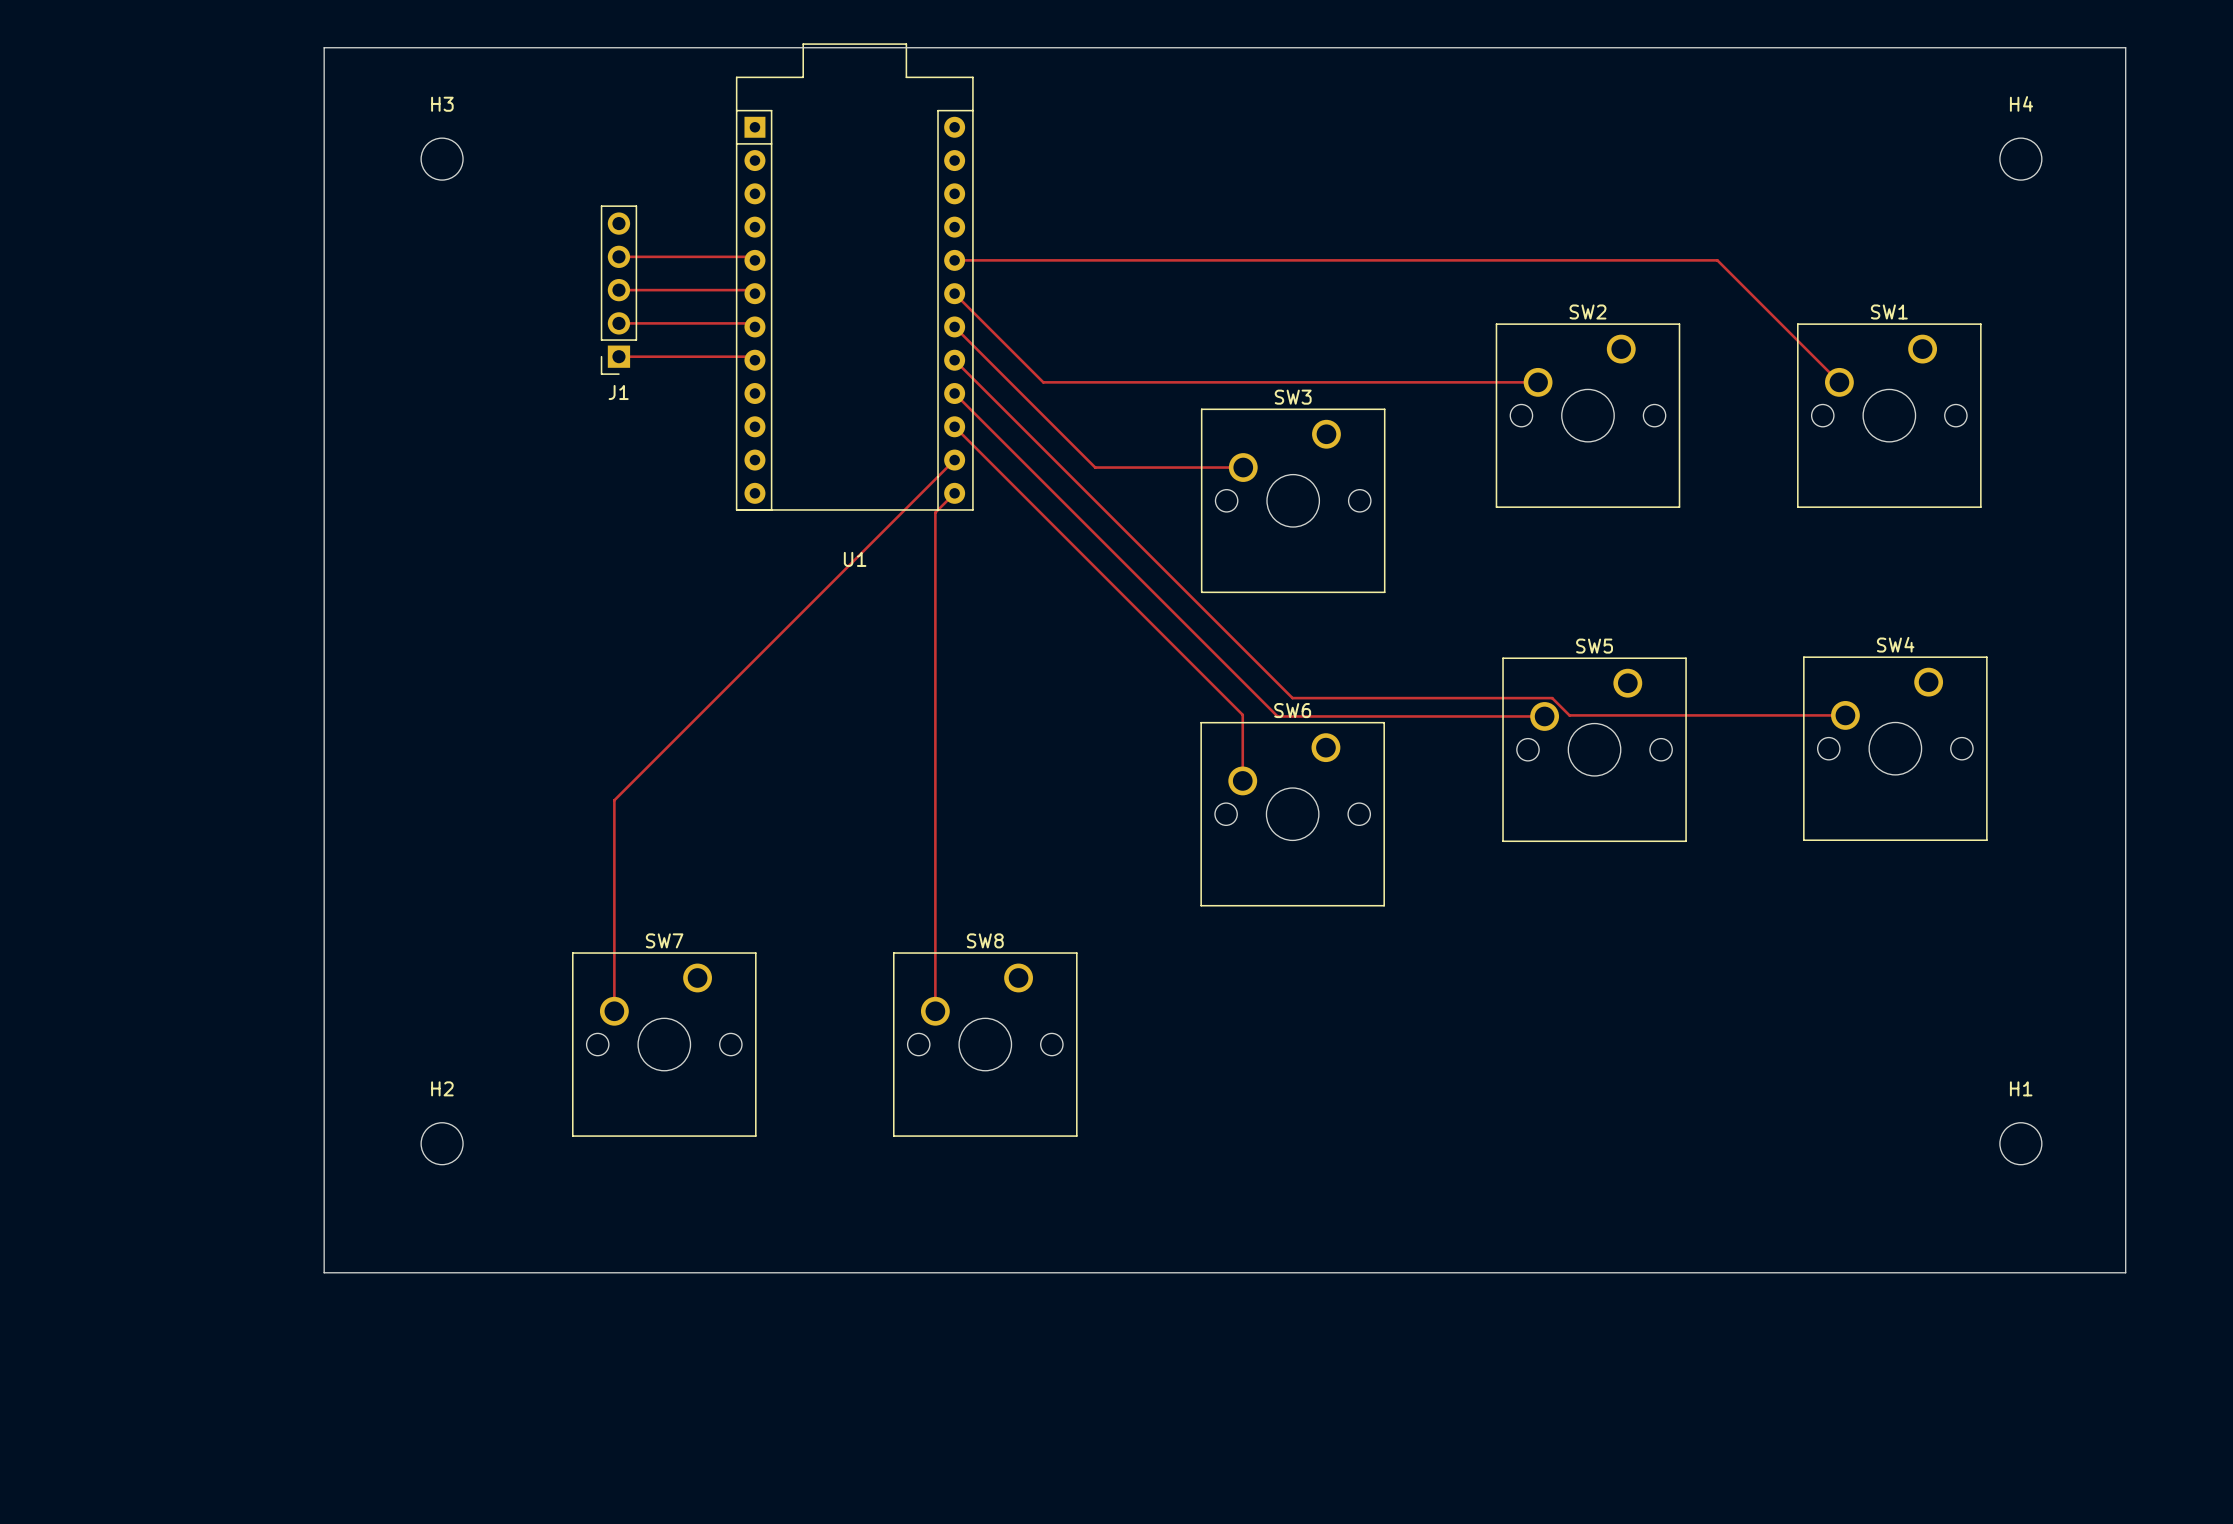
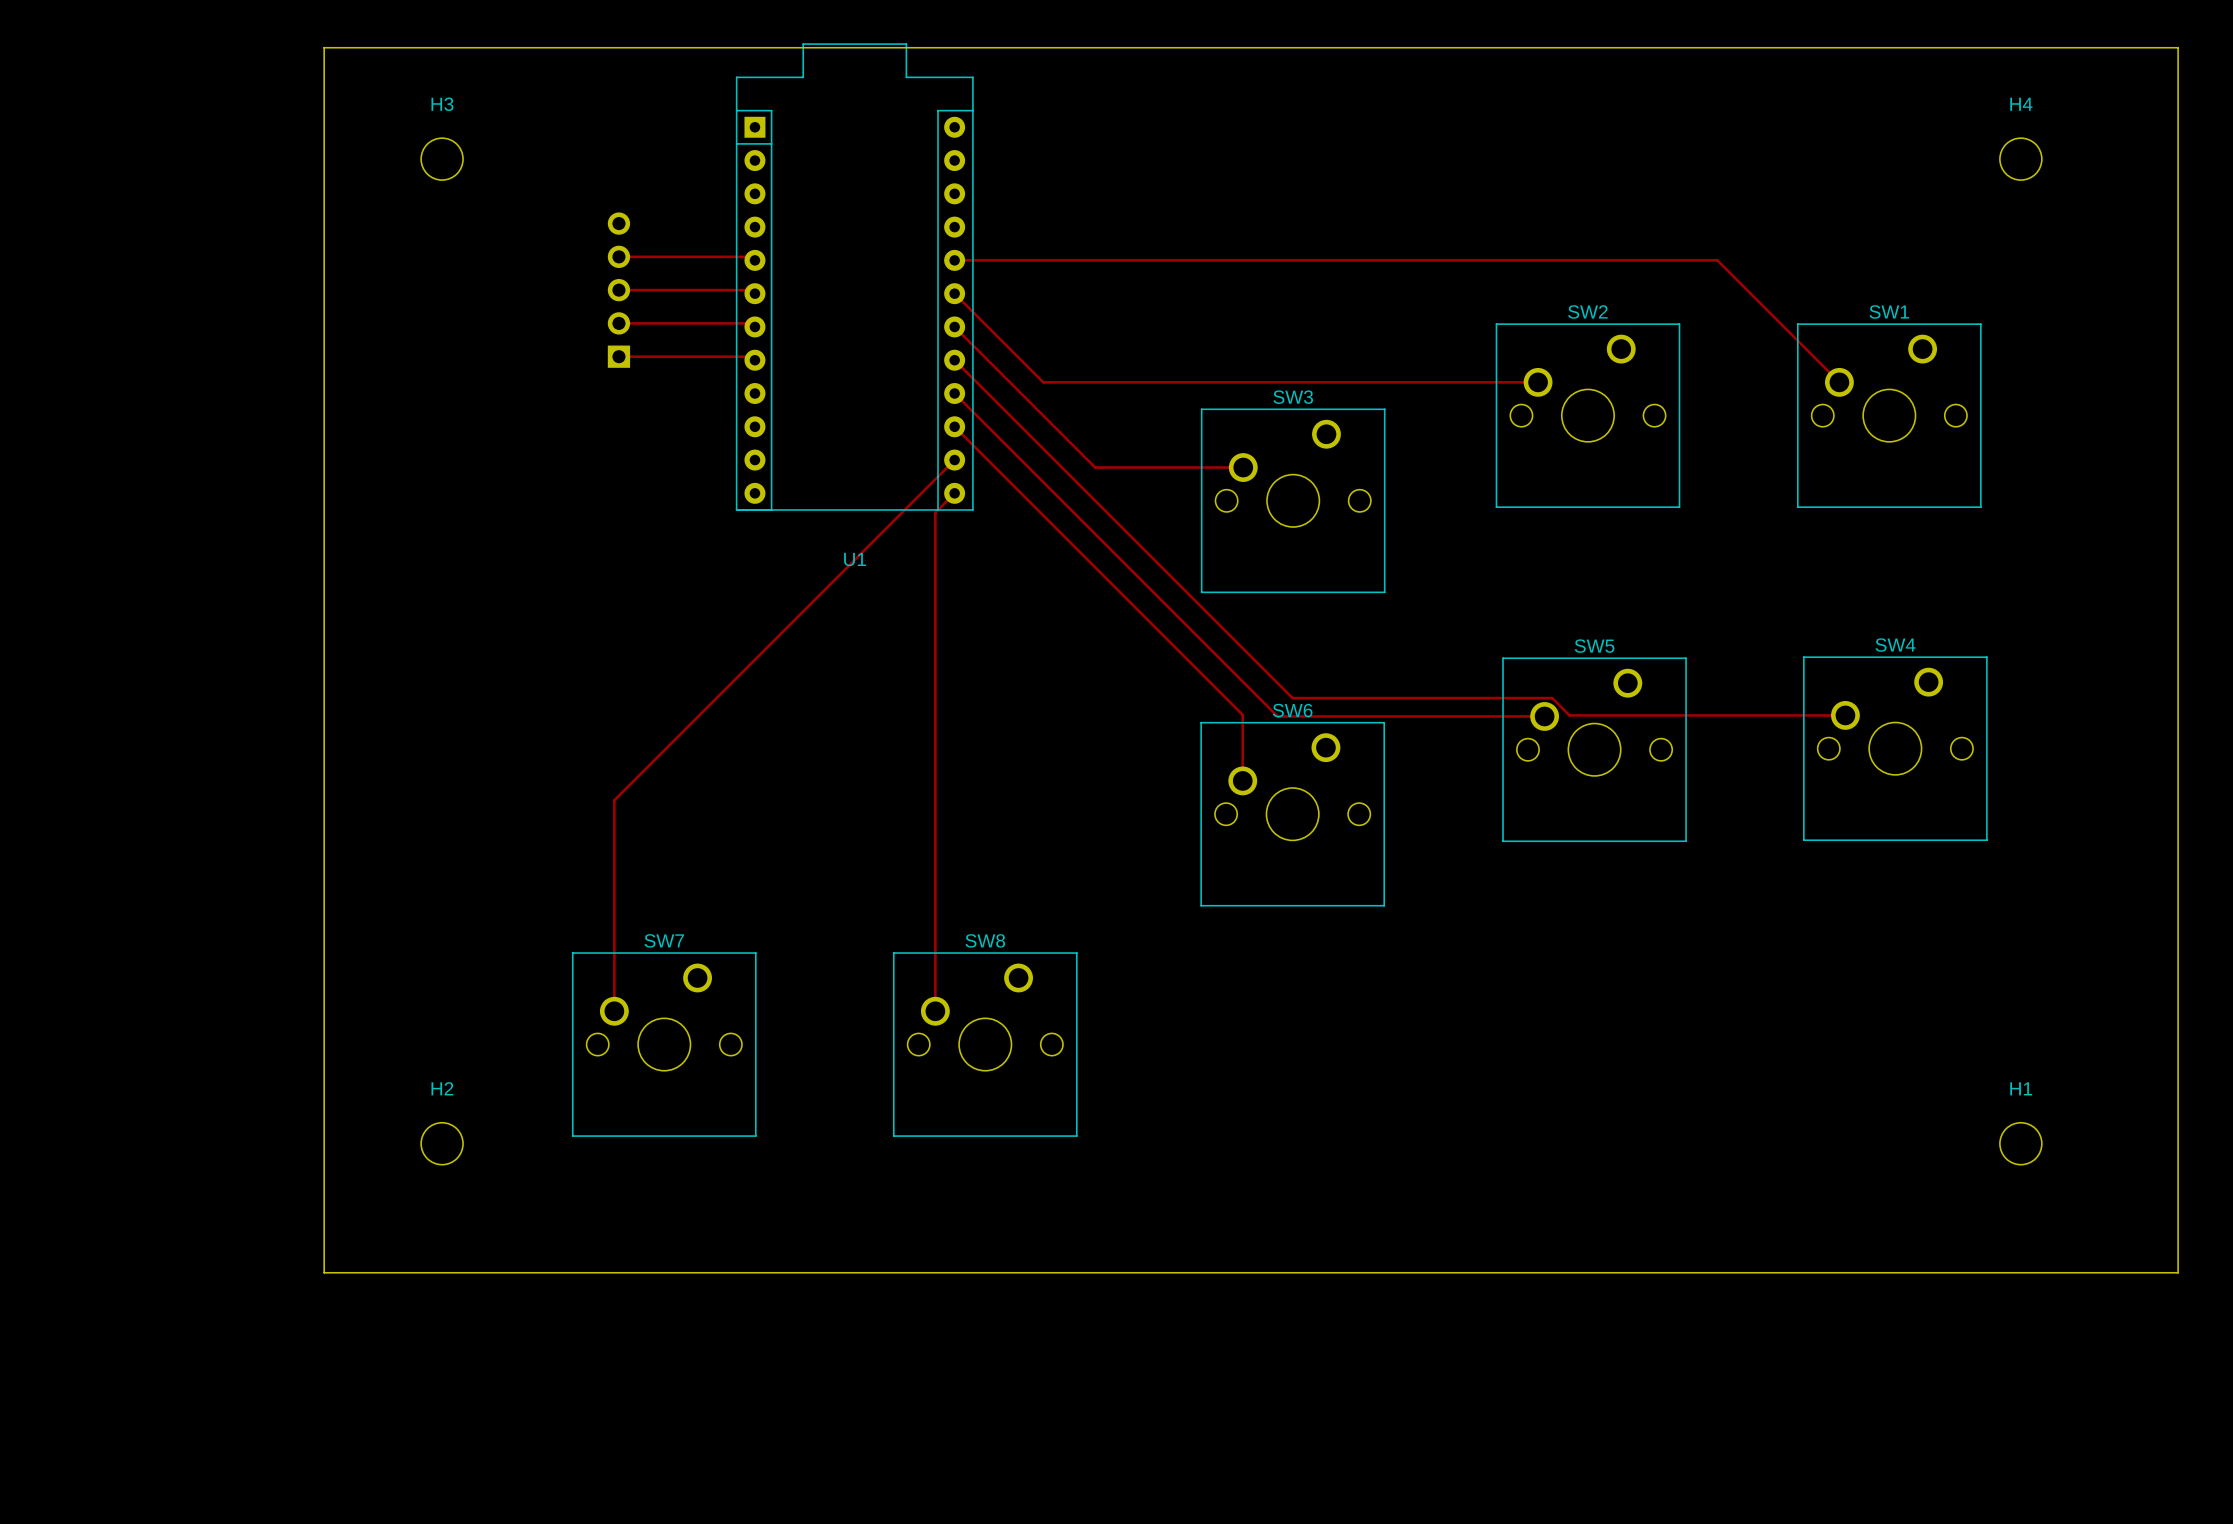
board edge: (2125, 47) (2125, 1272) -> (2125, 47) (2178, 47) (2178, 1272) (2125, 1272)
J1 side: top (618, 290) -> bottom (618, 290)

